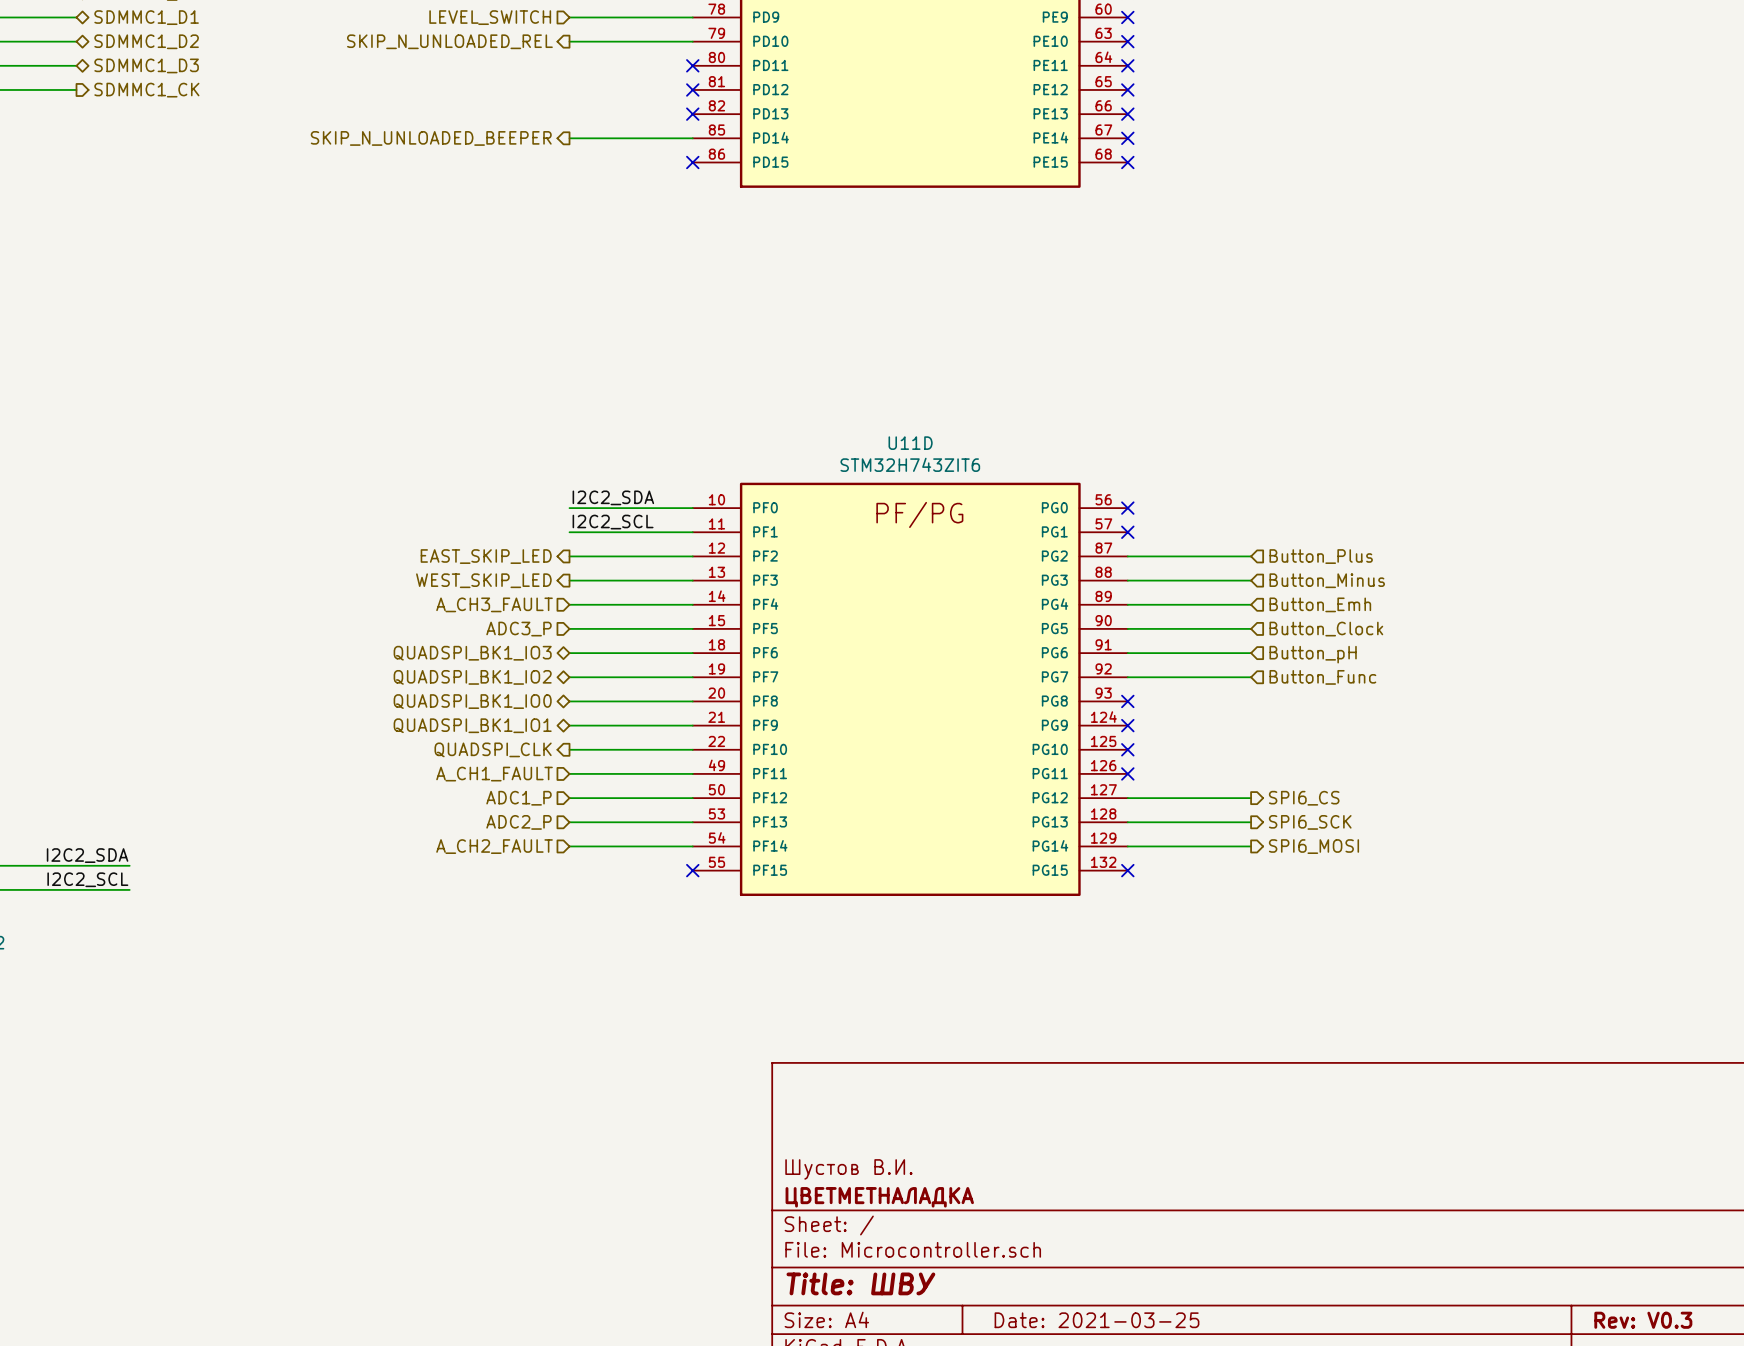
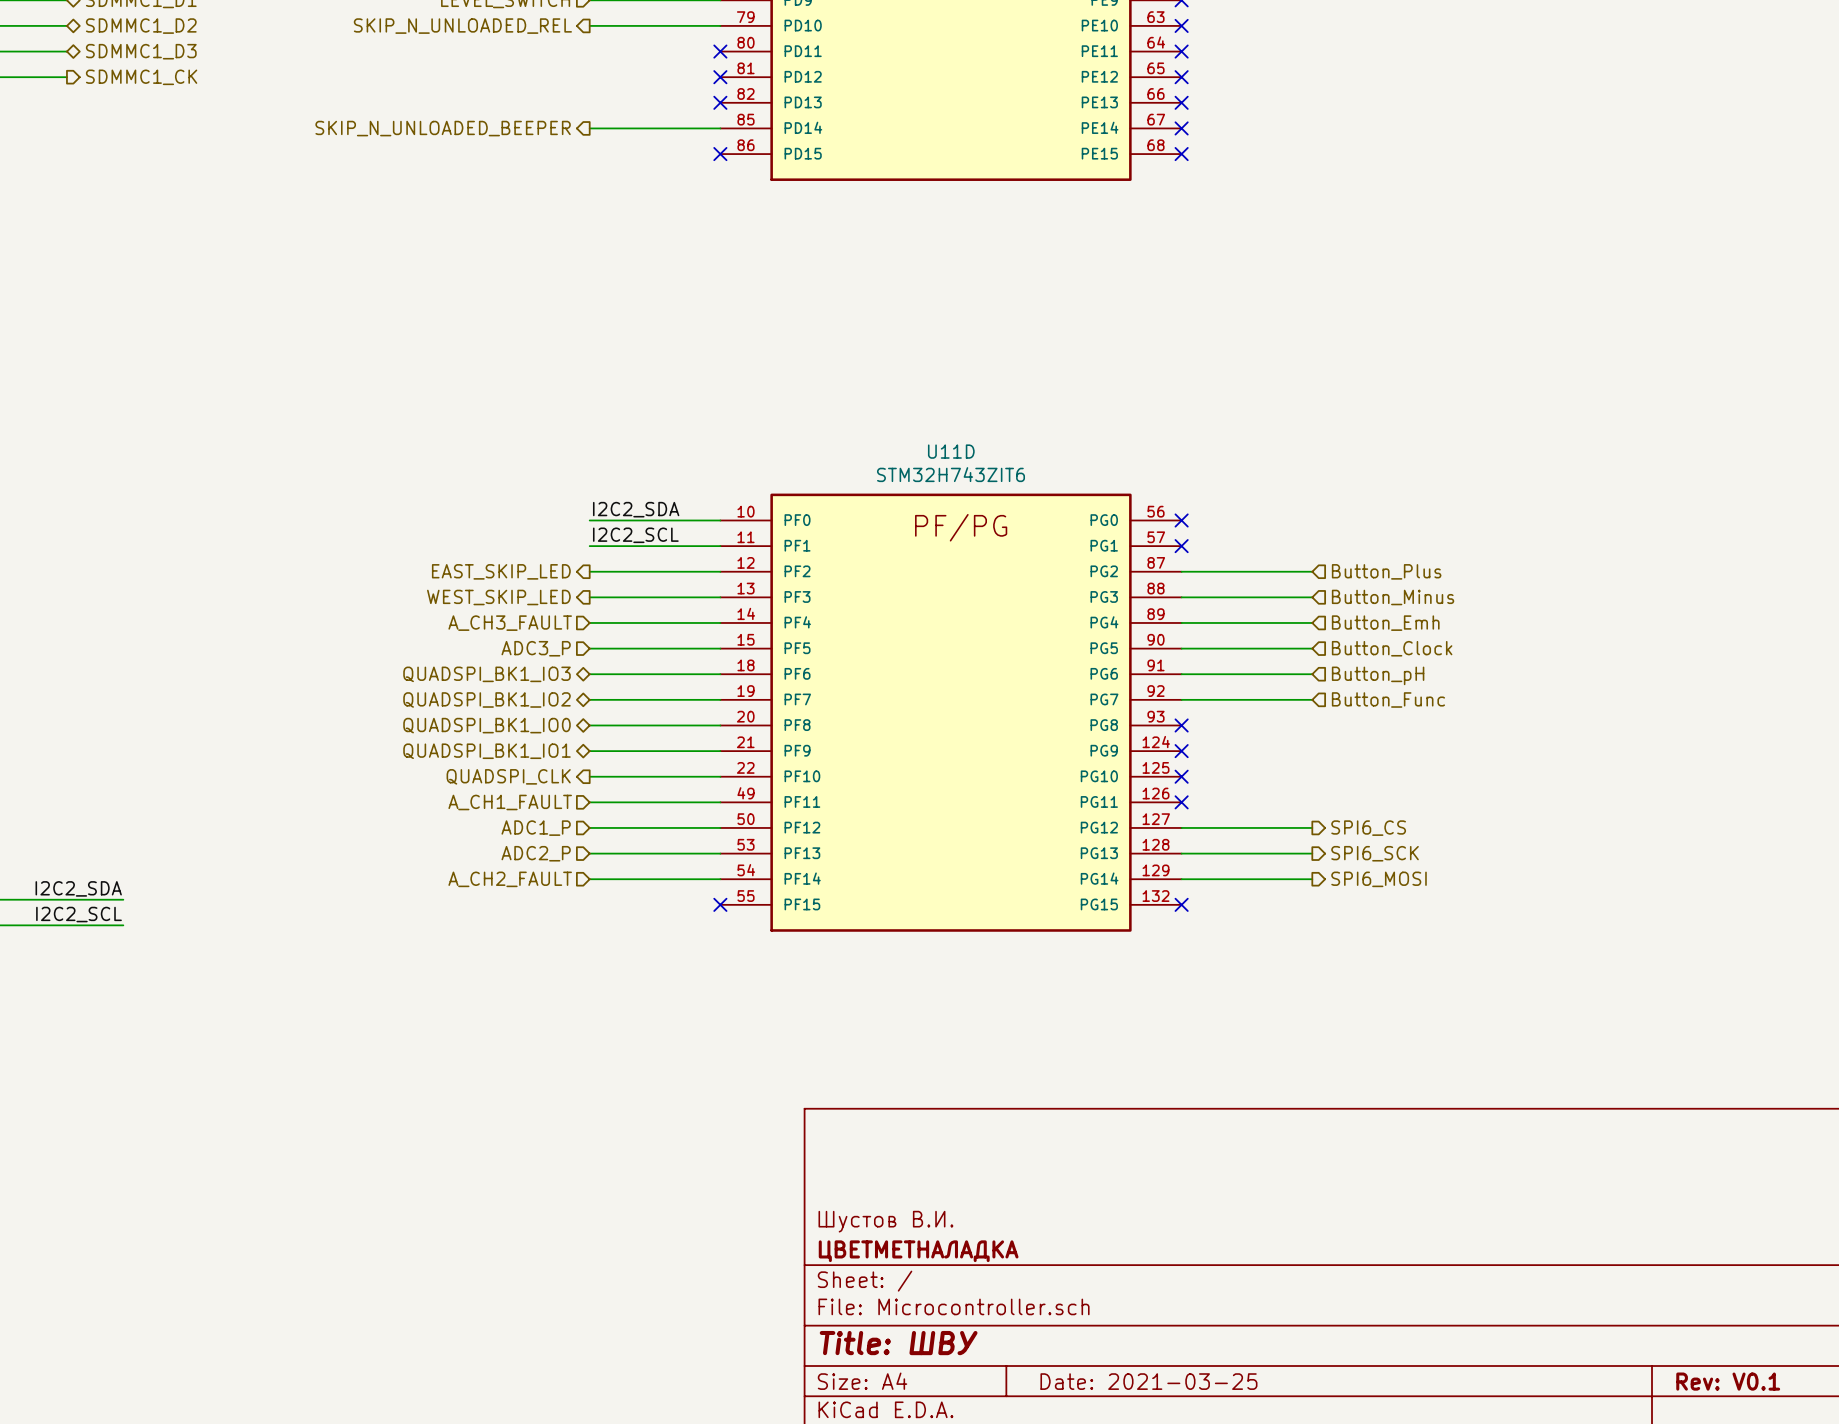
title block: Rev: V0.3 (1643, 1320) -> Rev: V0.1 (1728, 1381)

